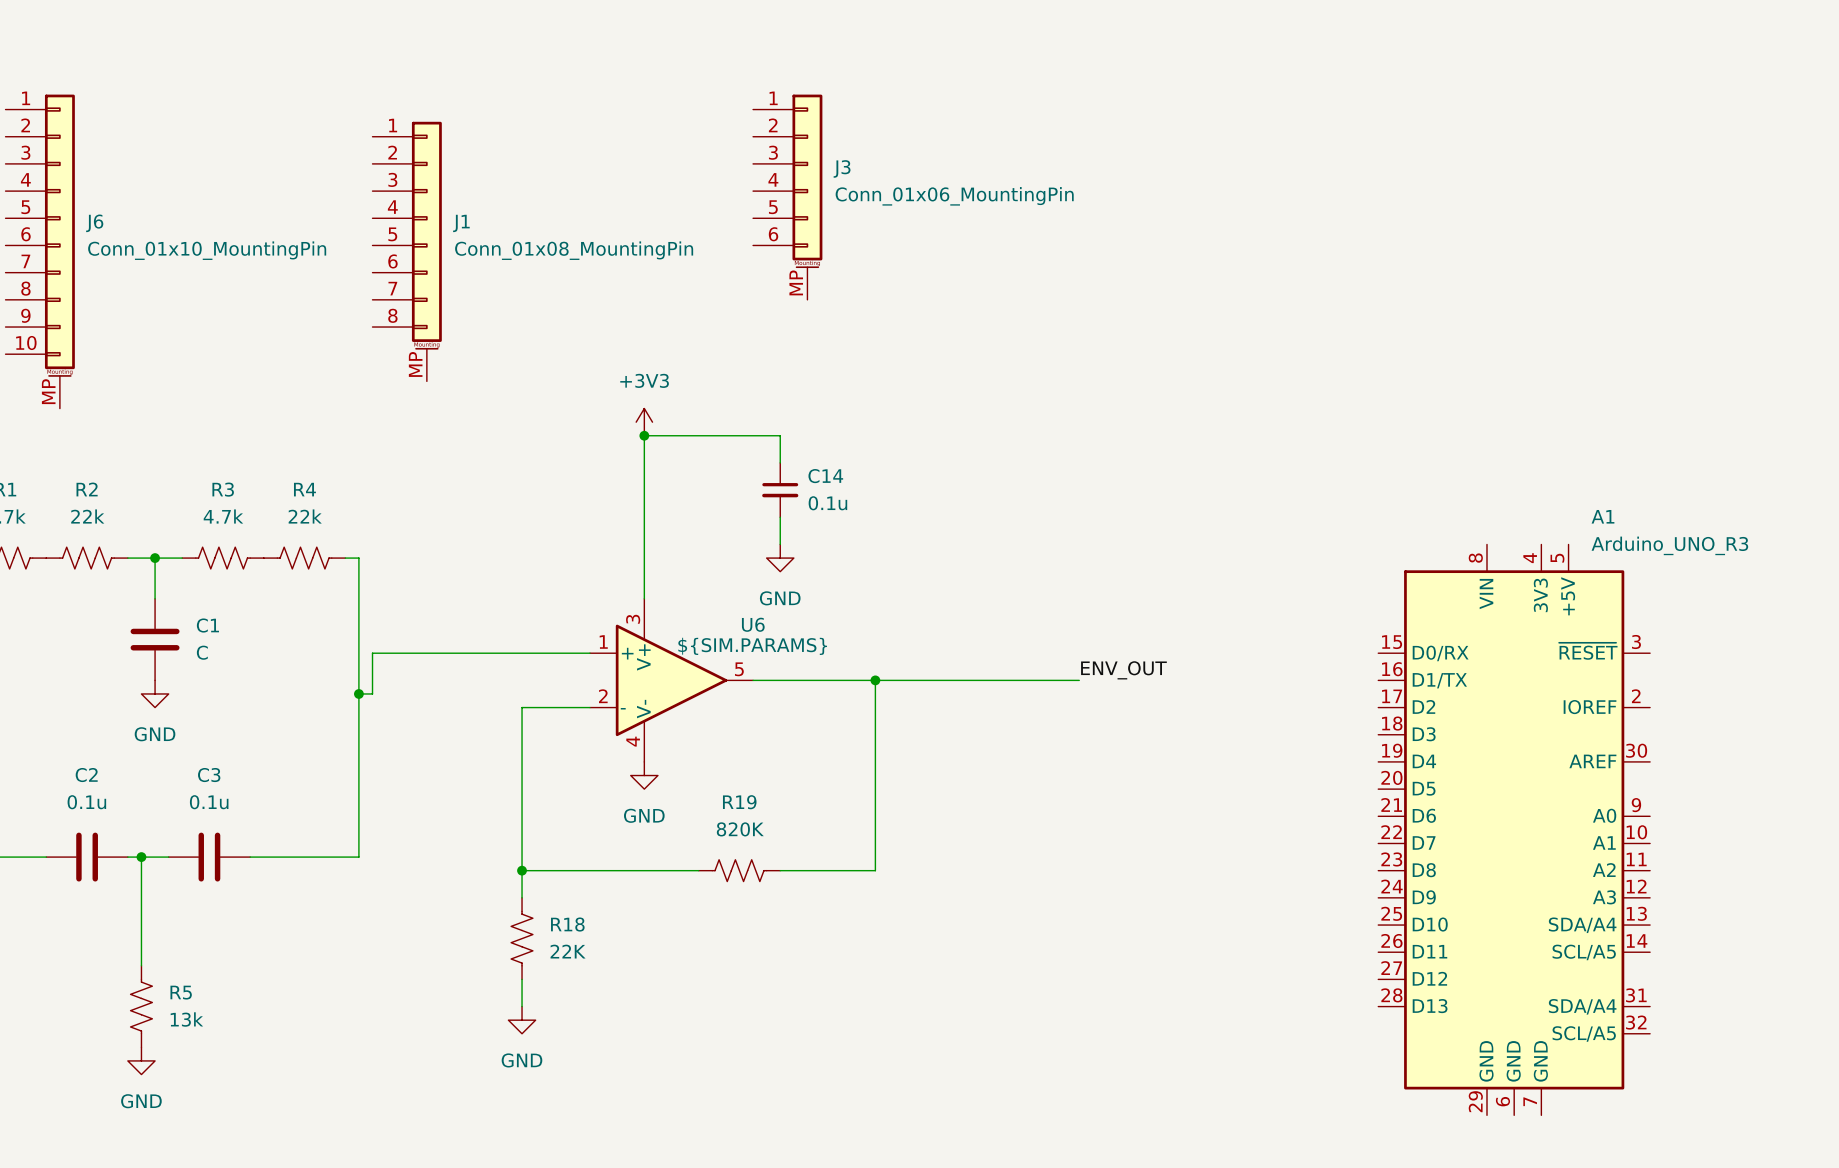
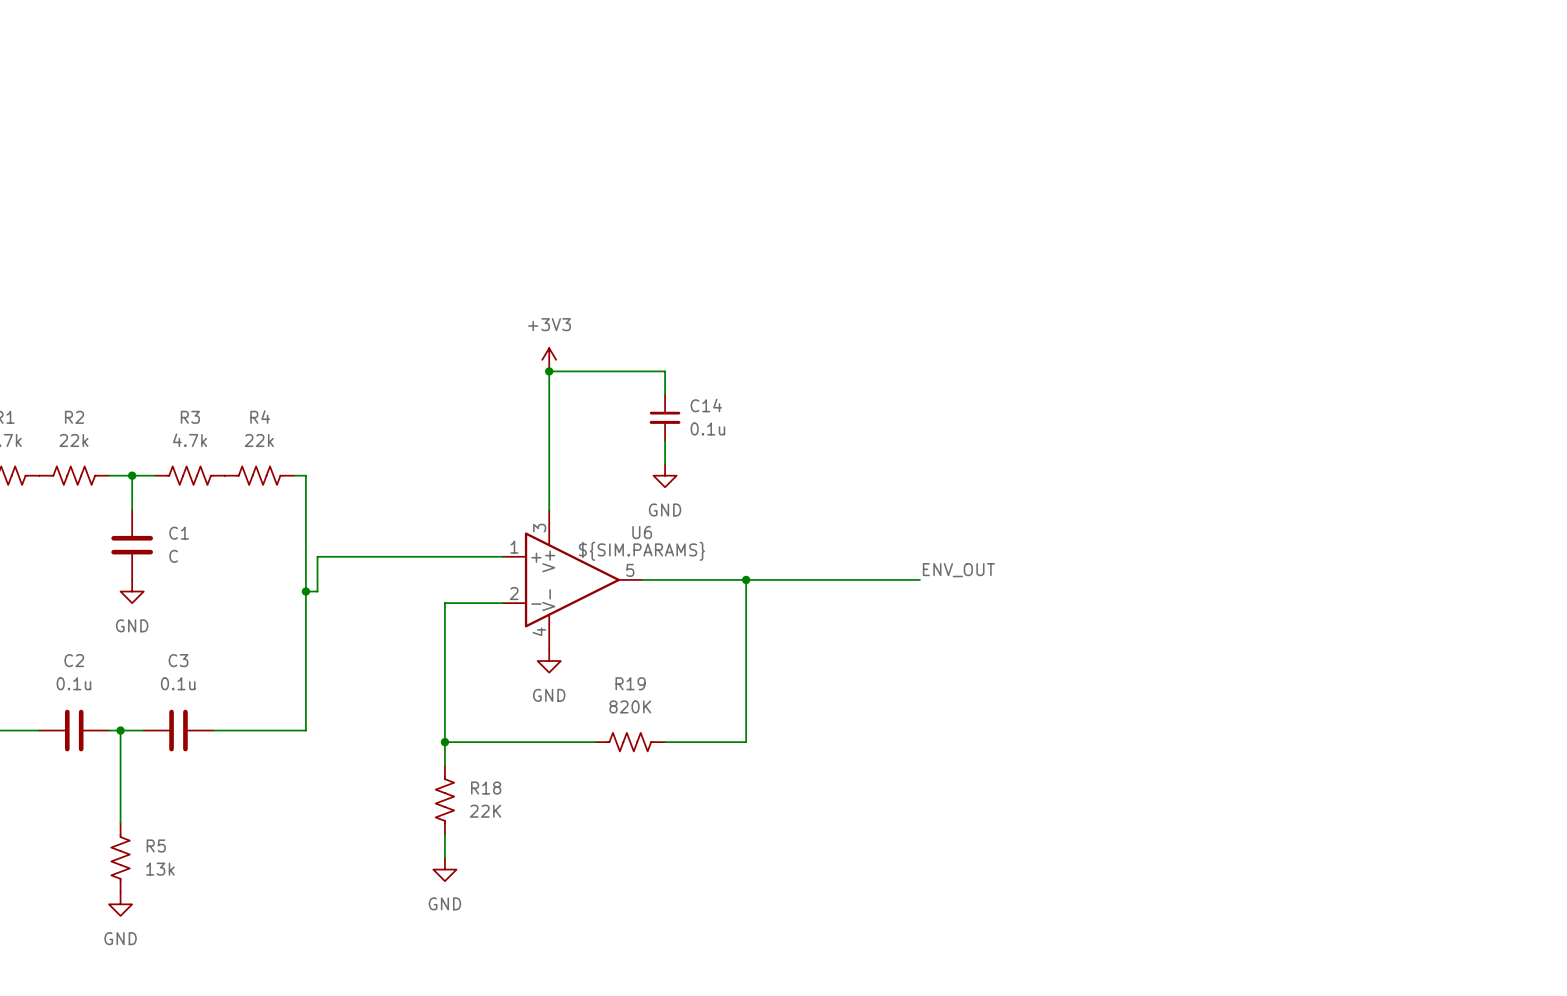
J3: Conn_01x06_MountingPin (787, 197) -> none
J6: Conn_01x10_MountingPin (40, 251) -> none
J1: Conn_01x08_MountingPin (407, 251) -> none
A1: Arduino_UNO_R3 (1514, 829) -> none

